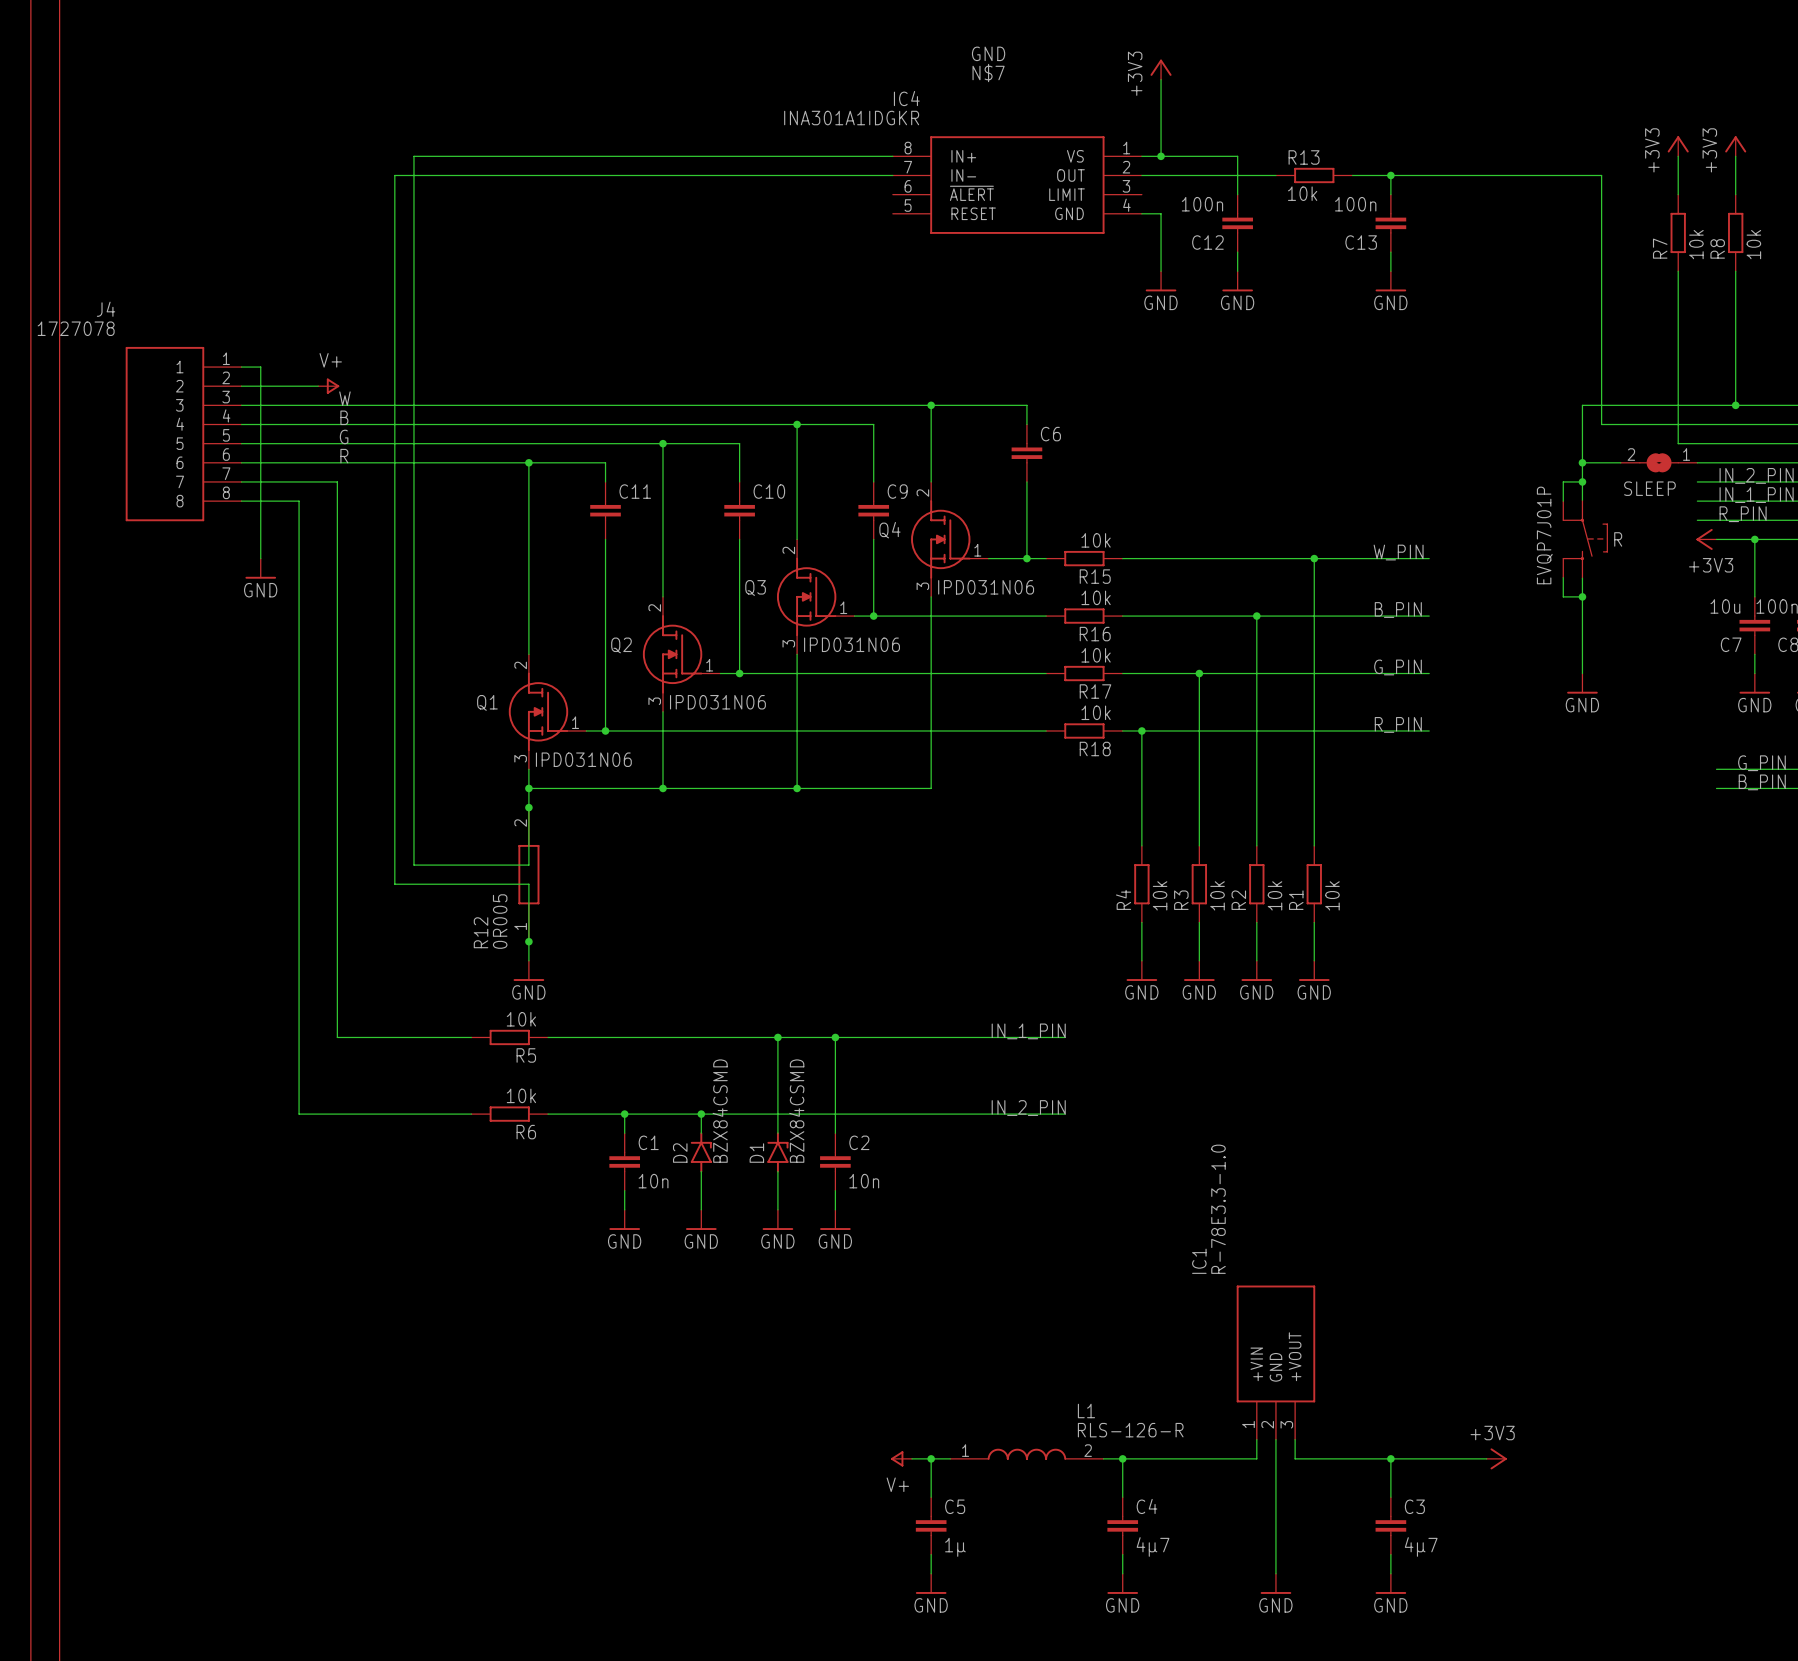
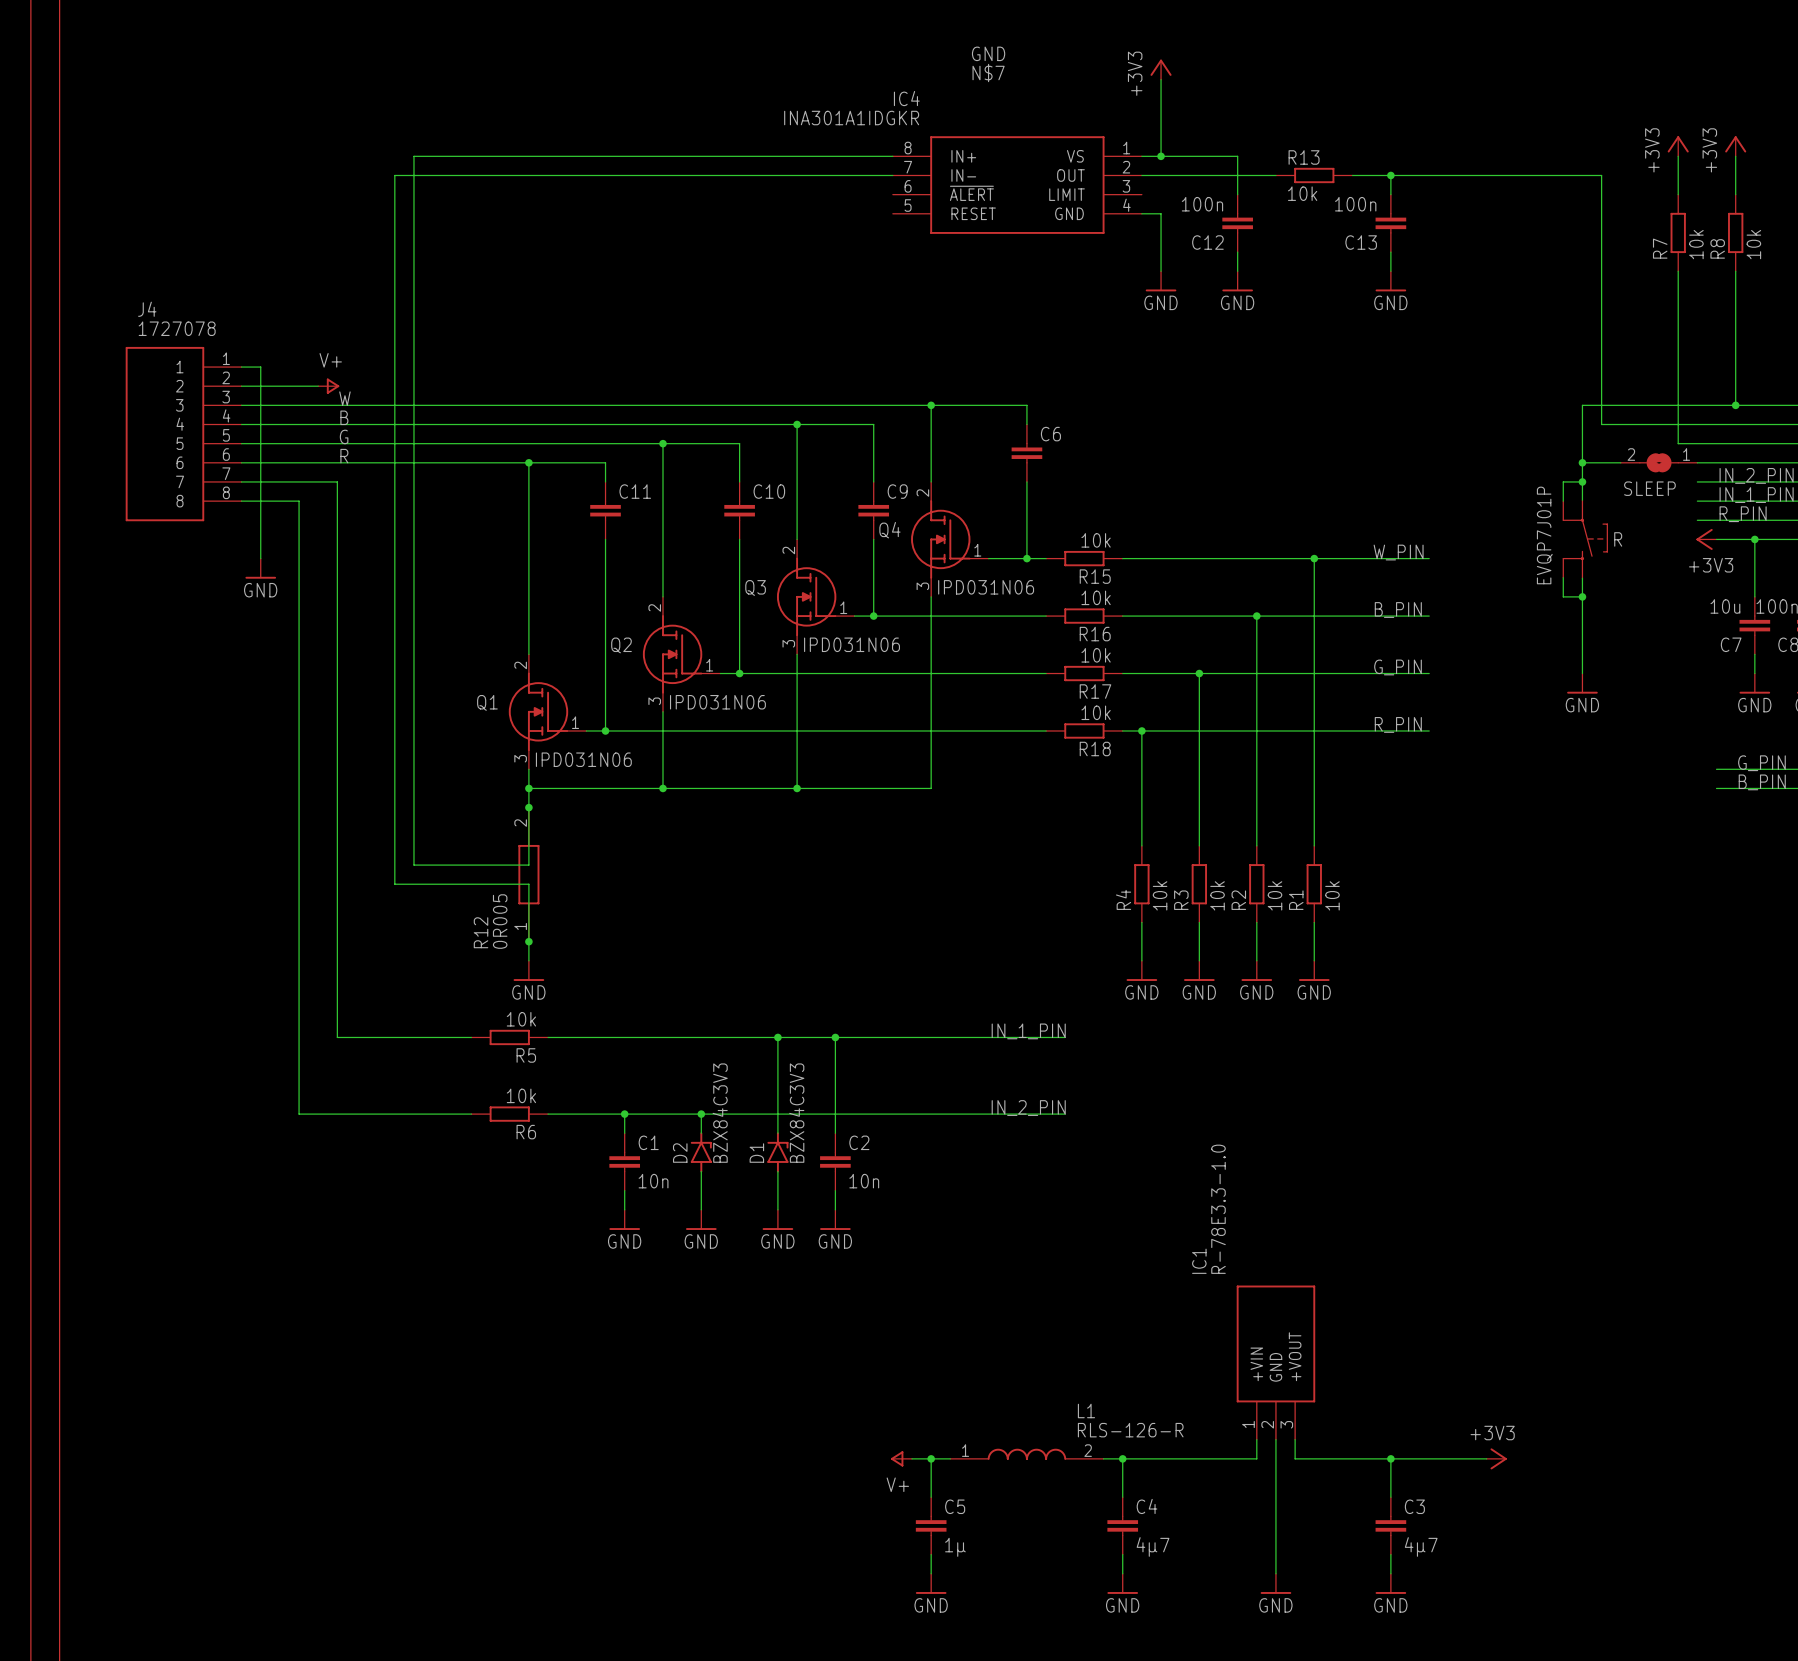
J4 name position: J4 (106, 309) -> J4 (147, 309)
J4 value position: 1727078 (76, 328) -> 1727078 (177, 328)
D2 value: BZX84CSMD (720, 1111) -> BZX84C3V3 (720, 1113)
D1 value: BZX84CSMD (796, 1111) -> BZX84C3V3 (796, 1113)

